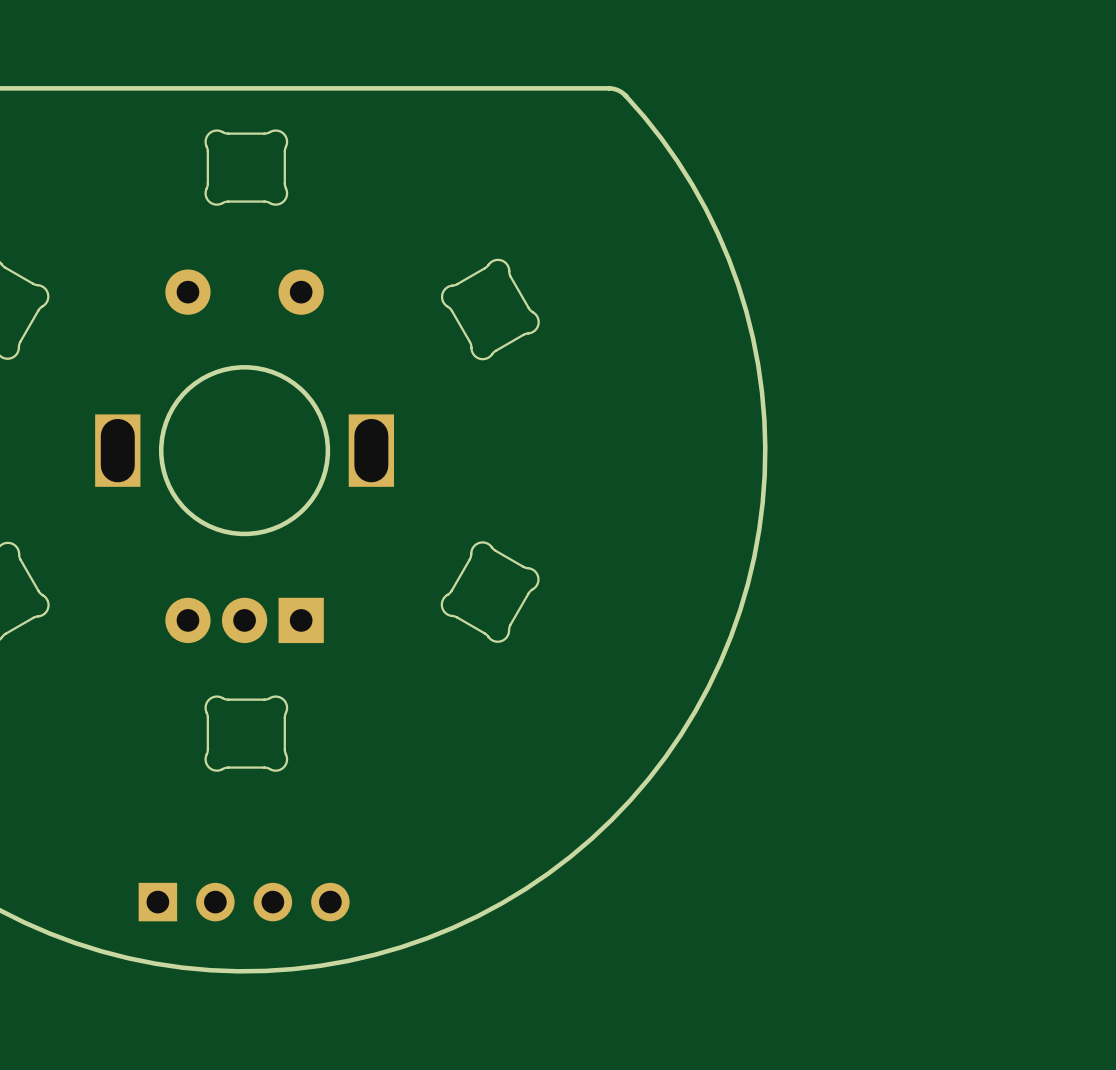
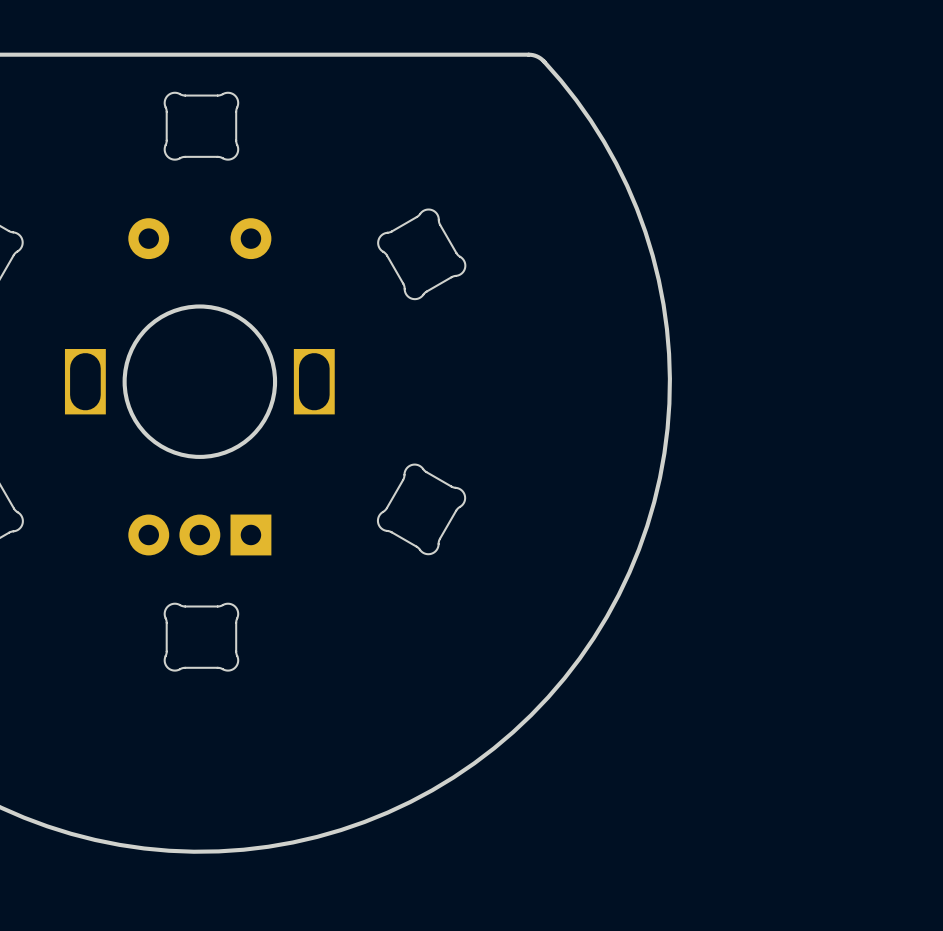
part: (244, 902) -> none

